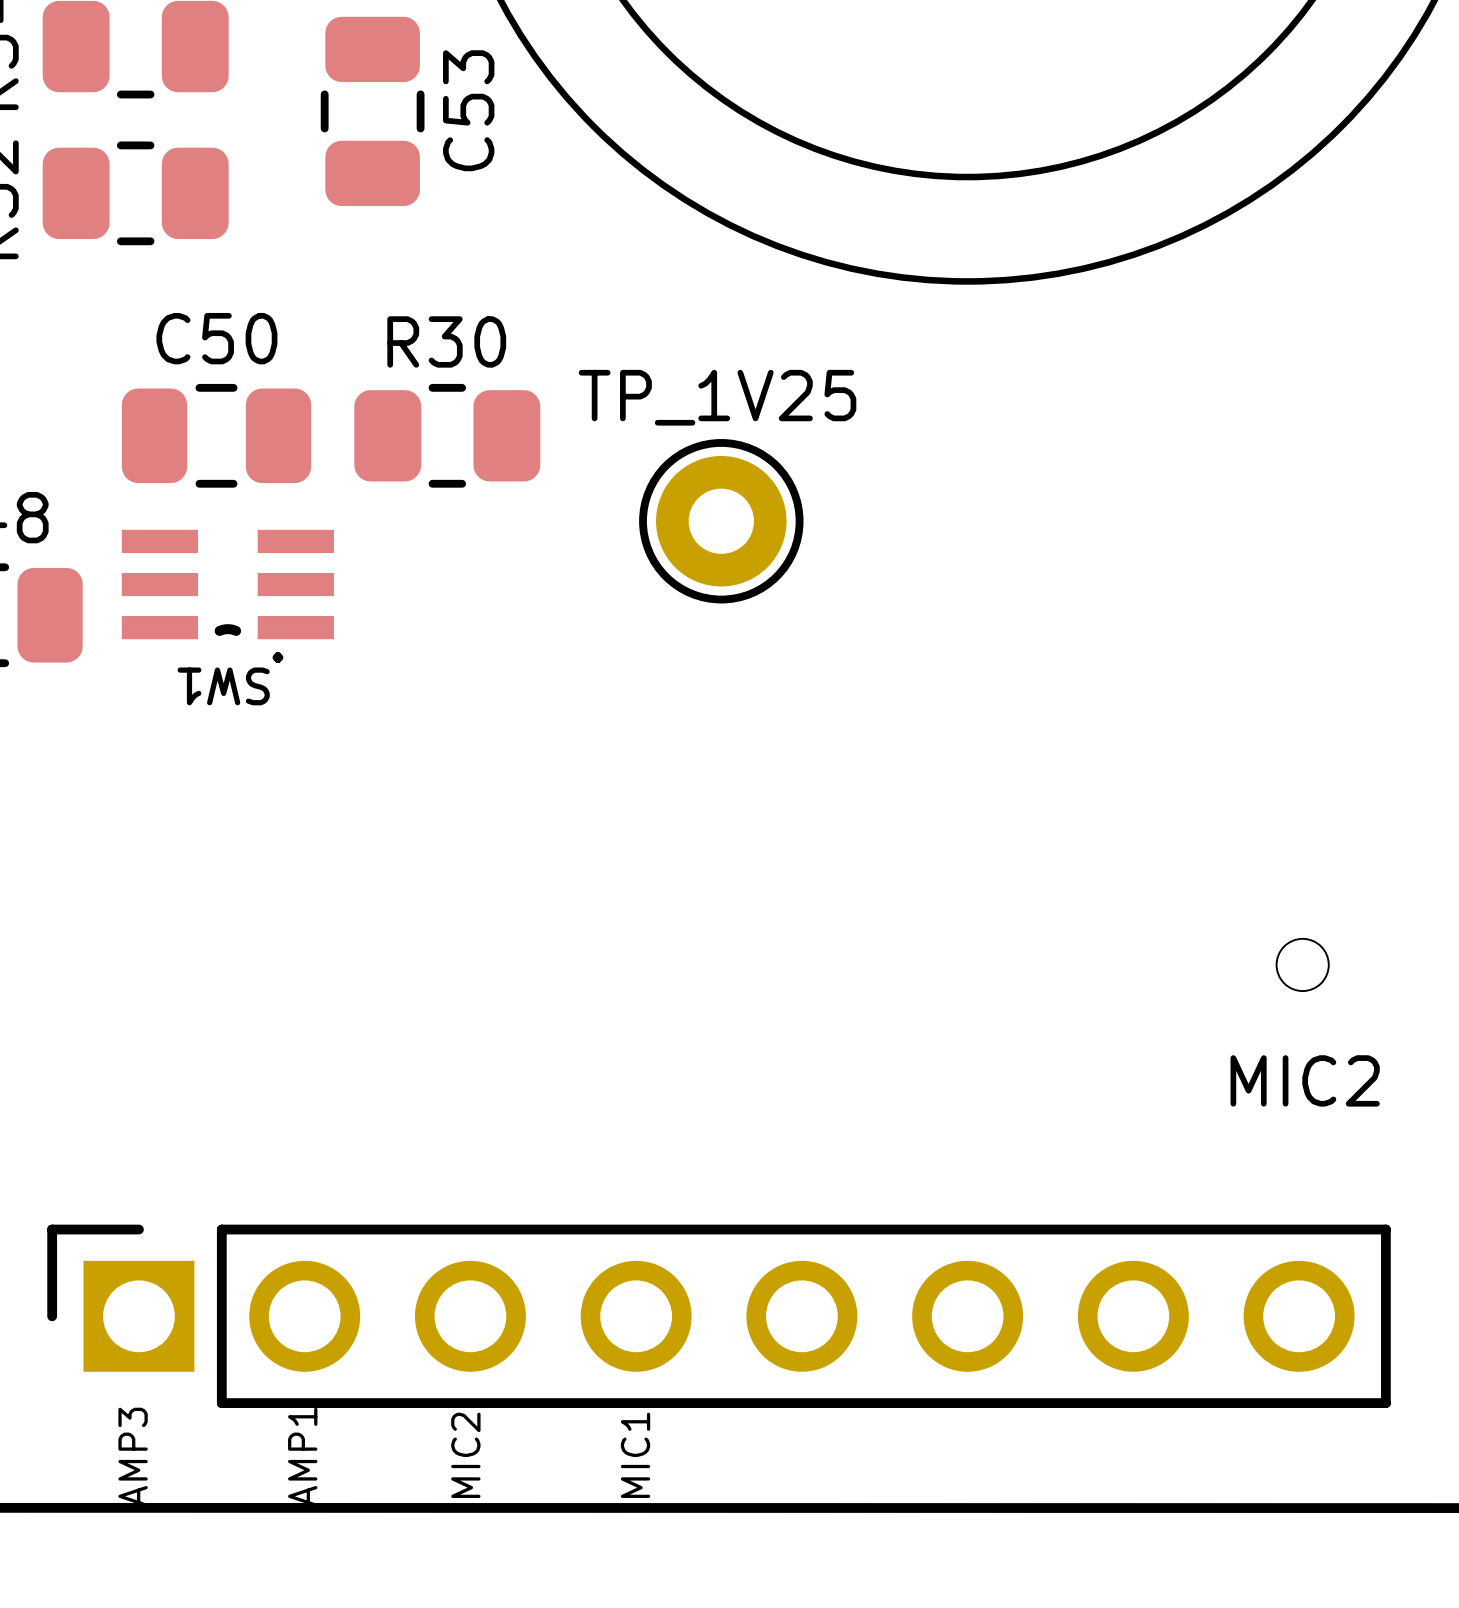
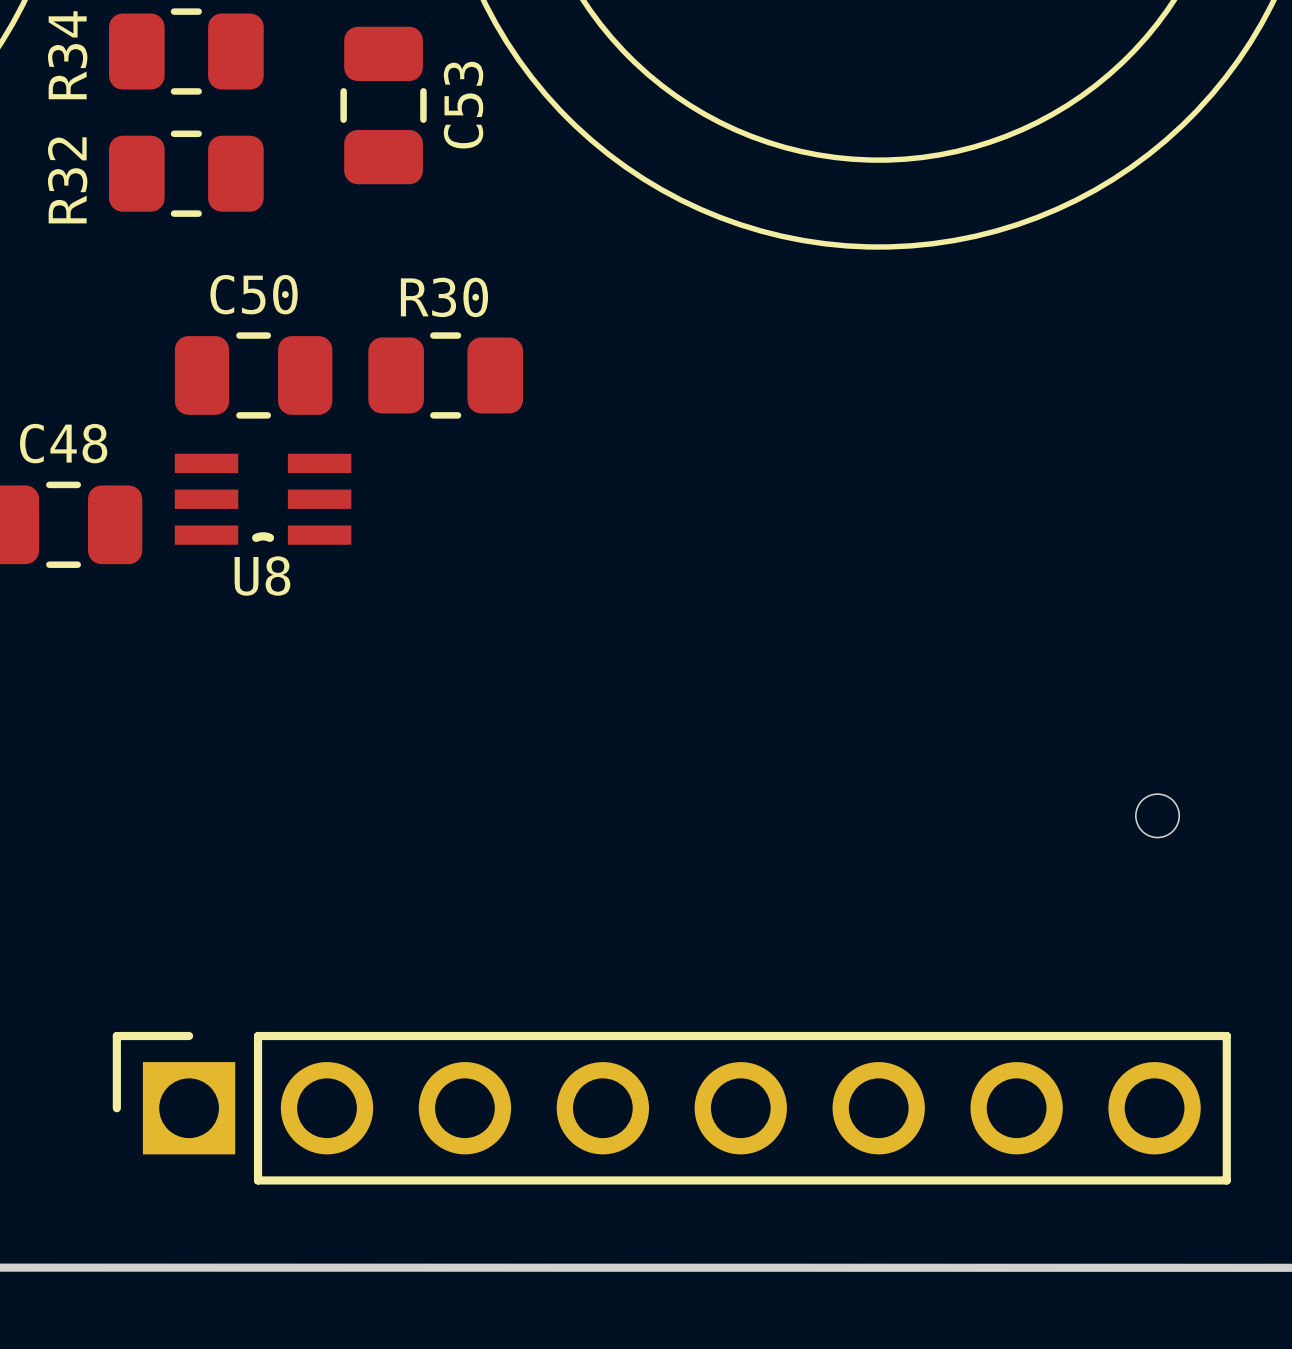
TP_1V25: (721, 521) -> none
U8 text: . (277, 657) -> none
U8 name: none -> U8 (262, 576)
U8 text: SW1 (223, 686) -> none
text: MIC2 (1305, 1080) -> none
text: MIC2 (465, 1455) -> none
text: MIC1 (635, 1455) -> none
text: AMP3 (133, 1457) -> none
text: AMP1 (302, 1457) -> none

